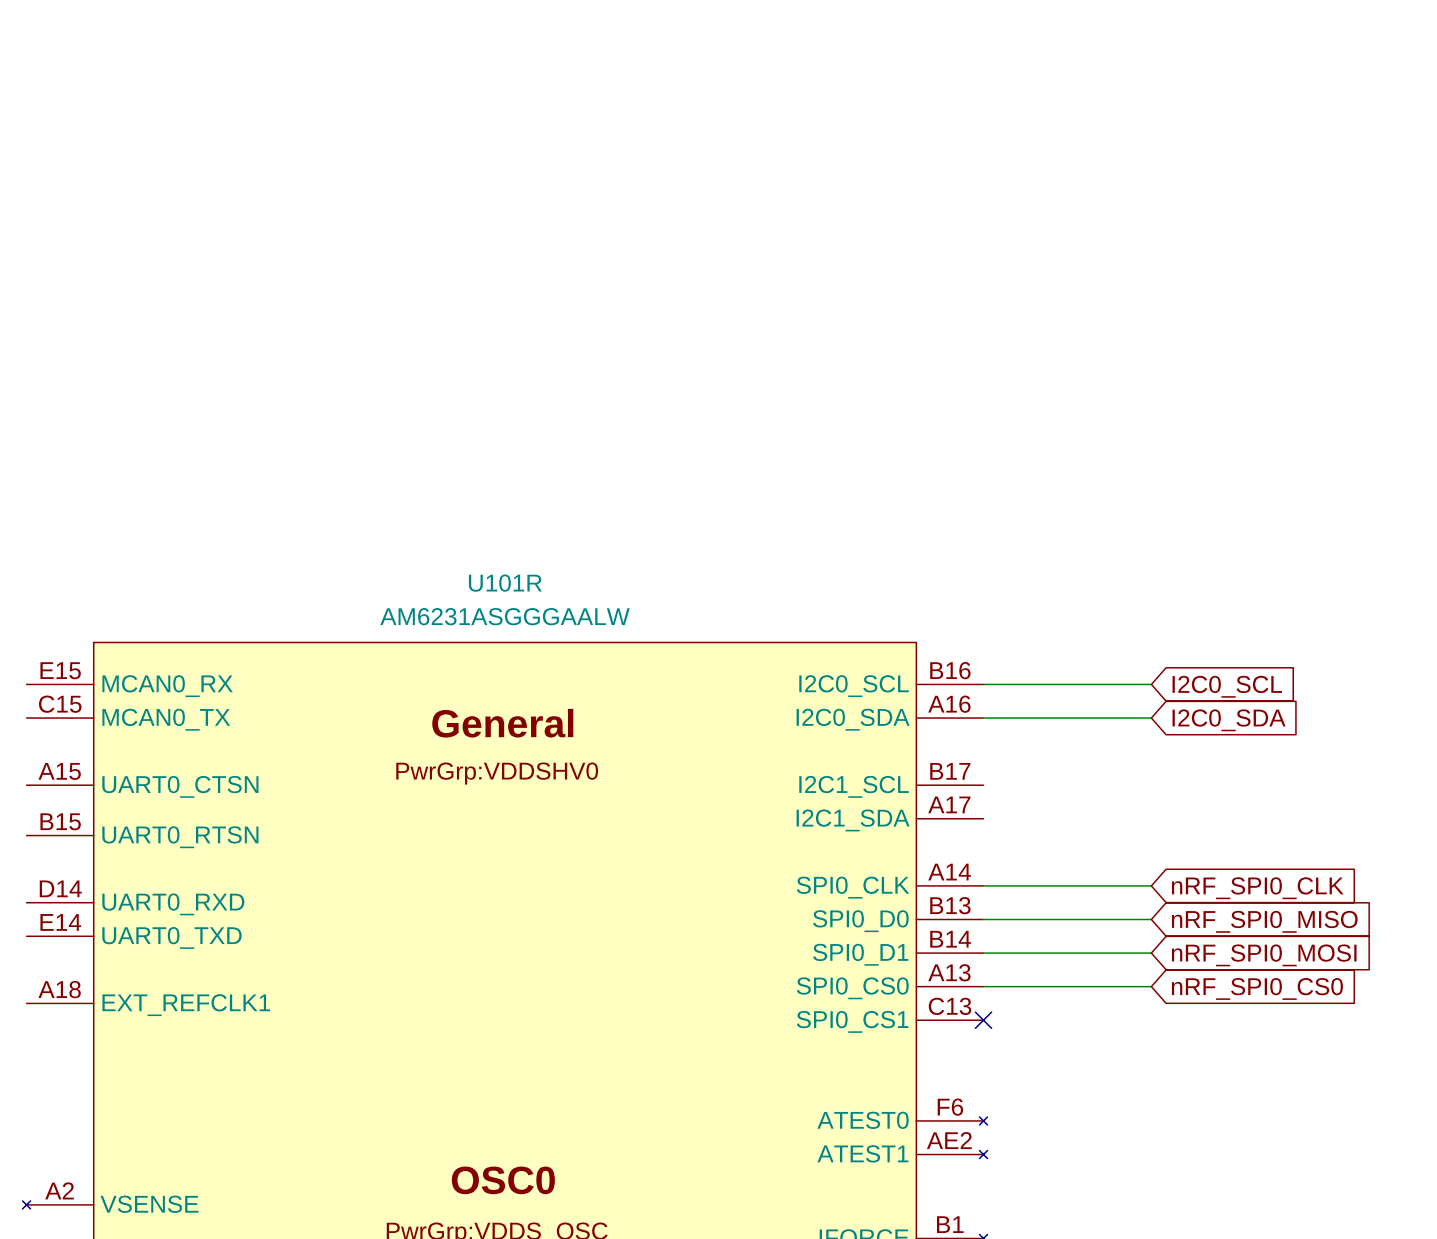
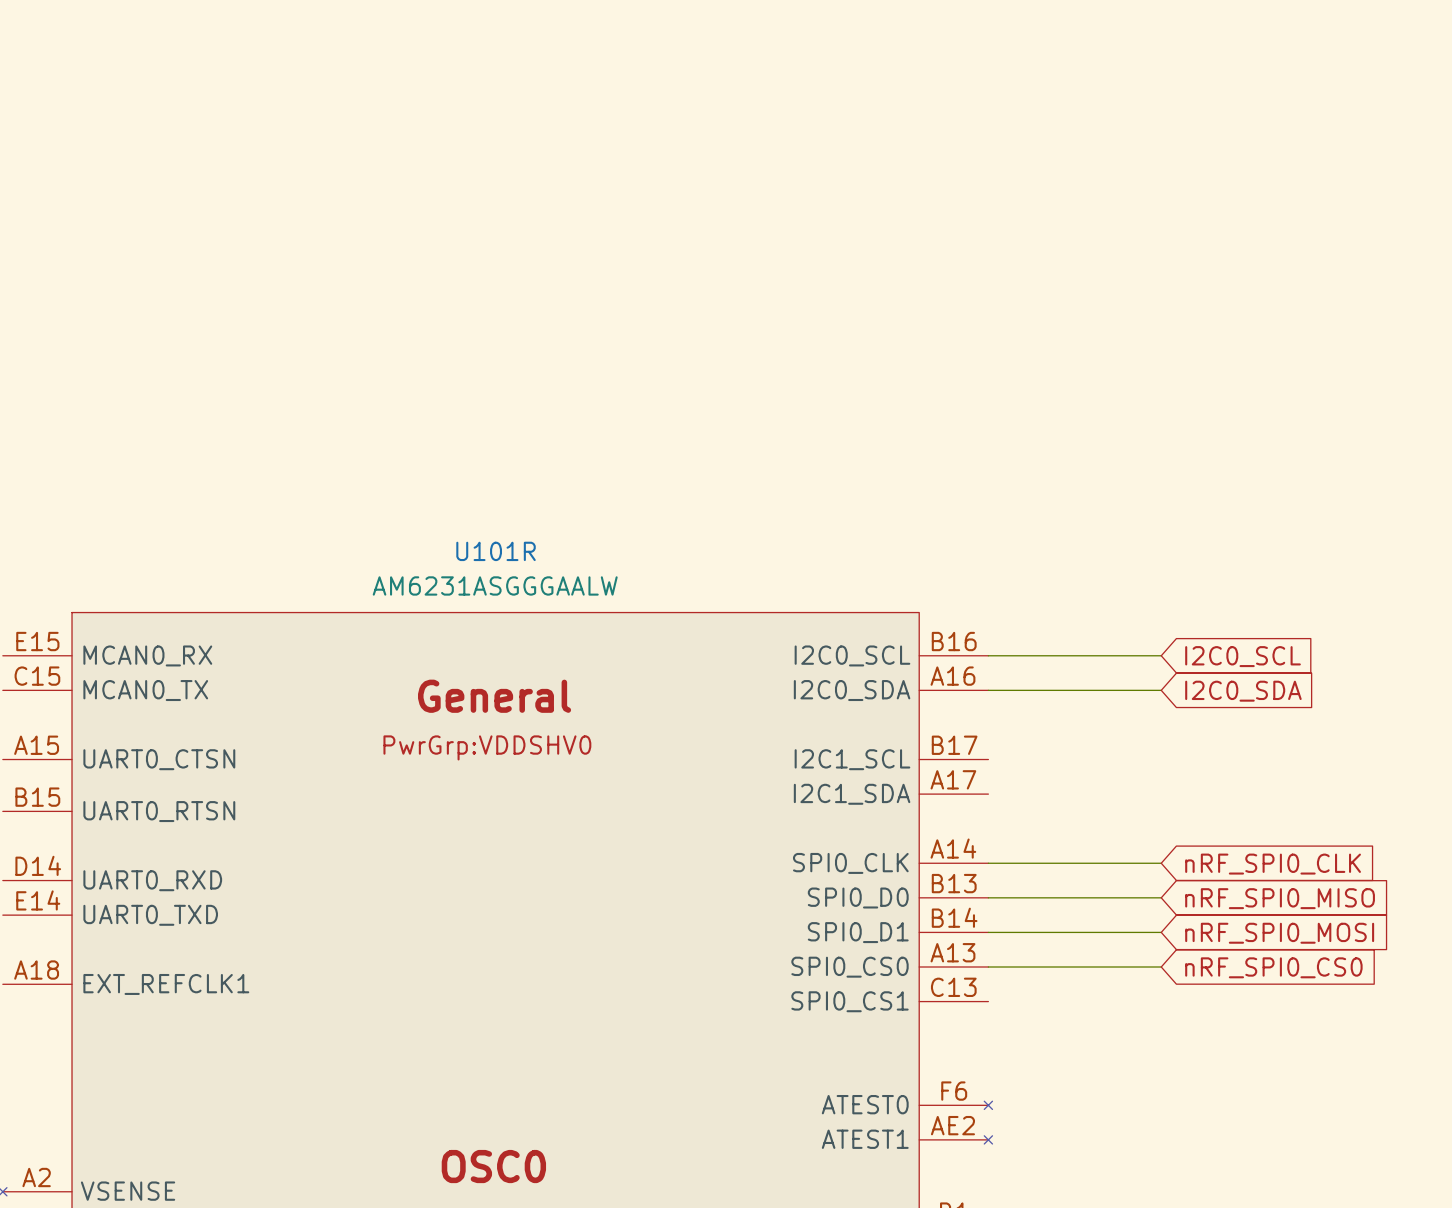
no-connect mark: (983, 1020) -> none

